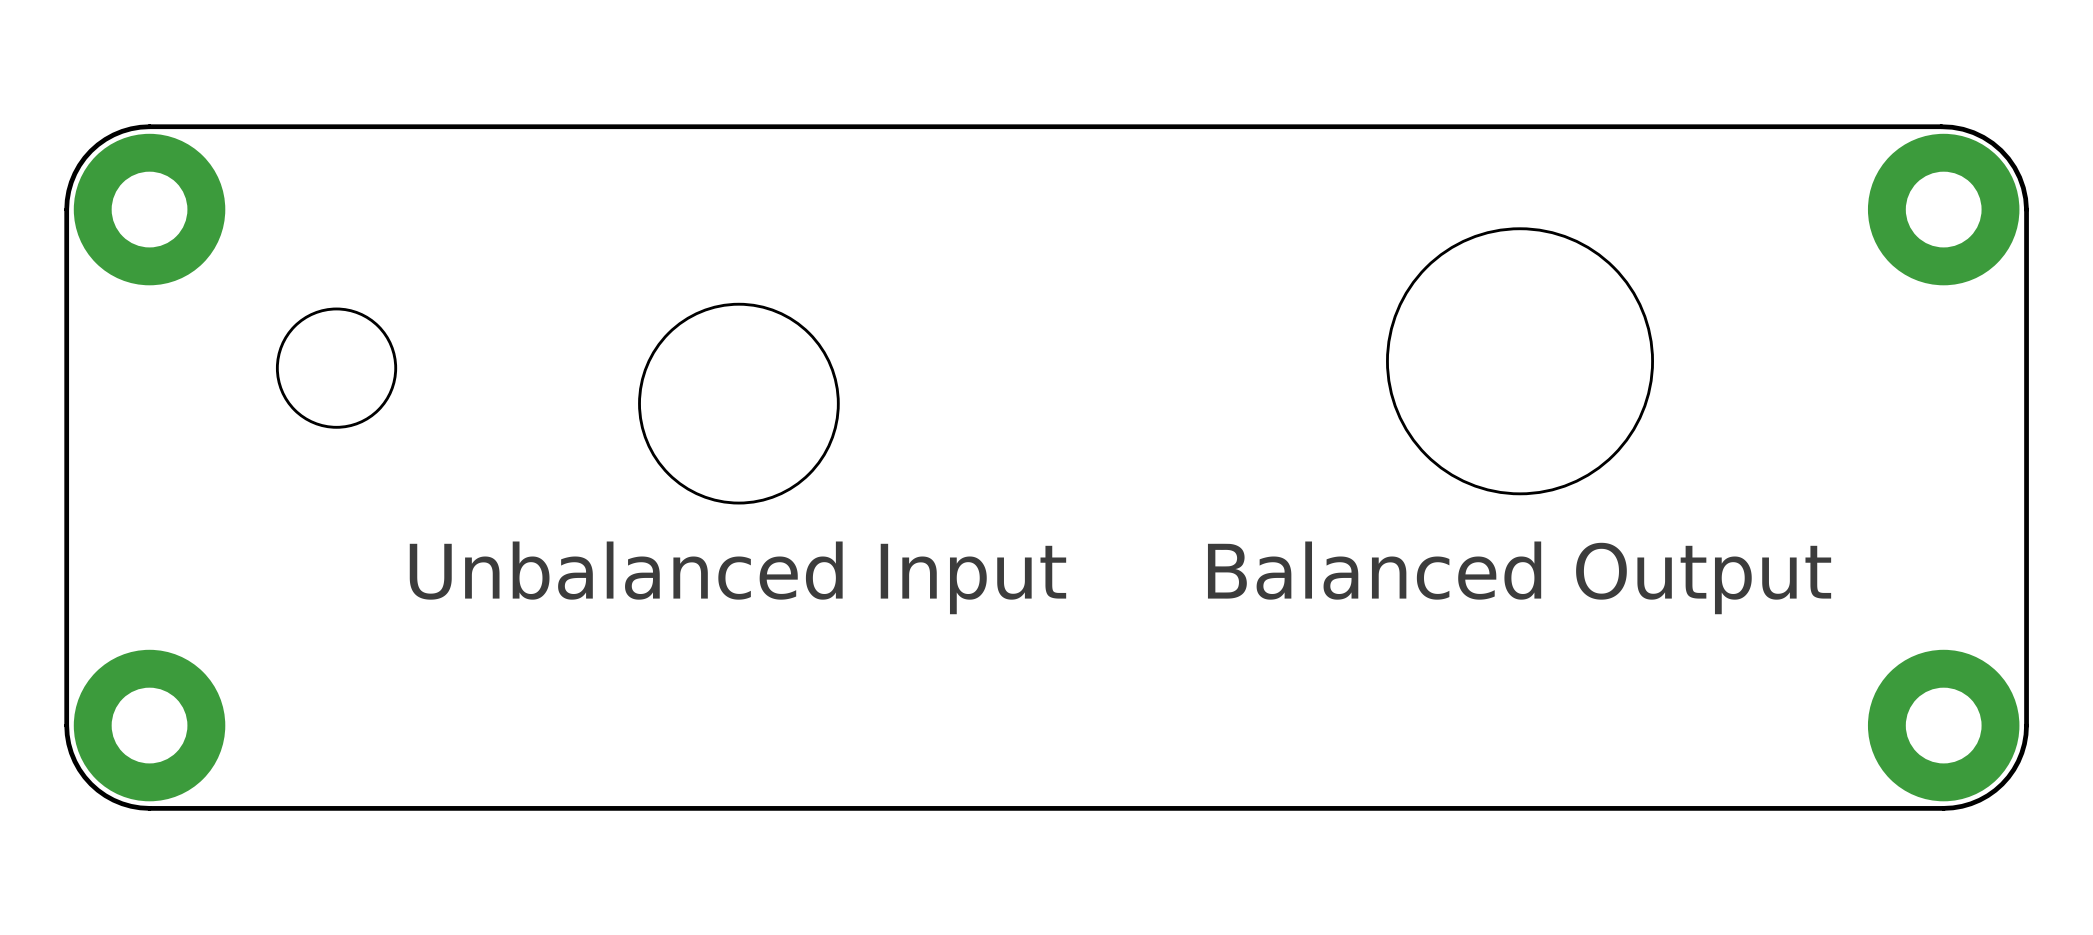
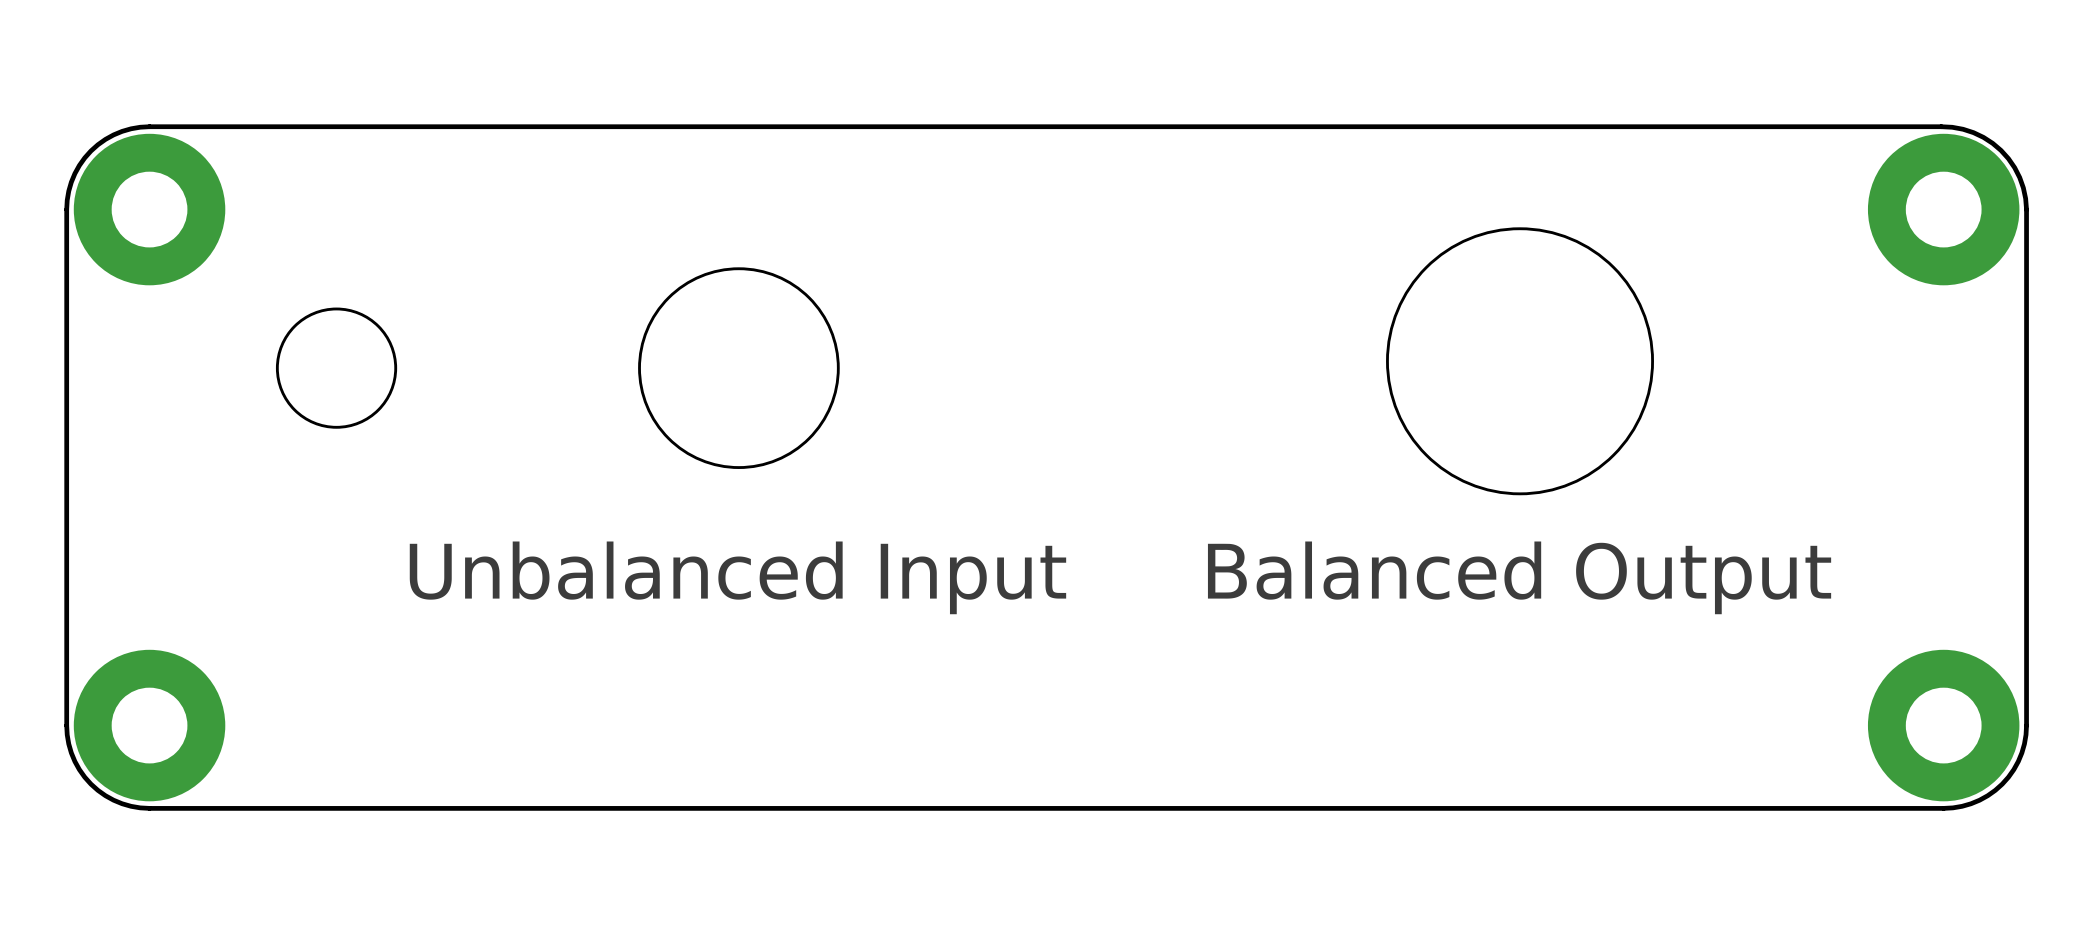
drawing position: (738, 403) -> (738, 368)

